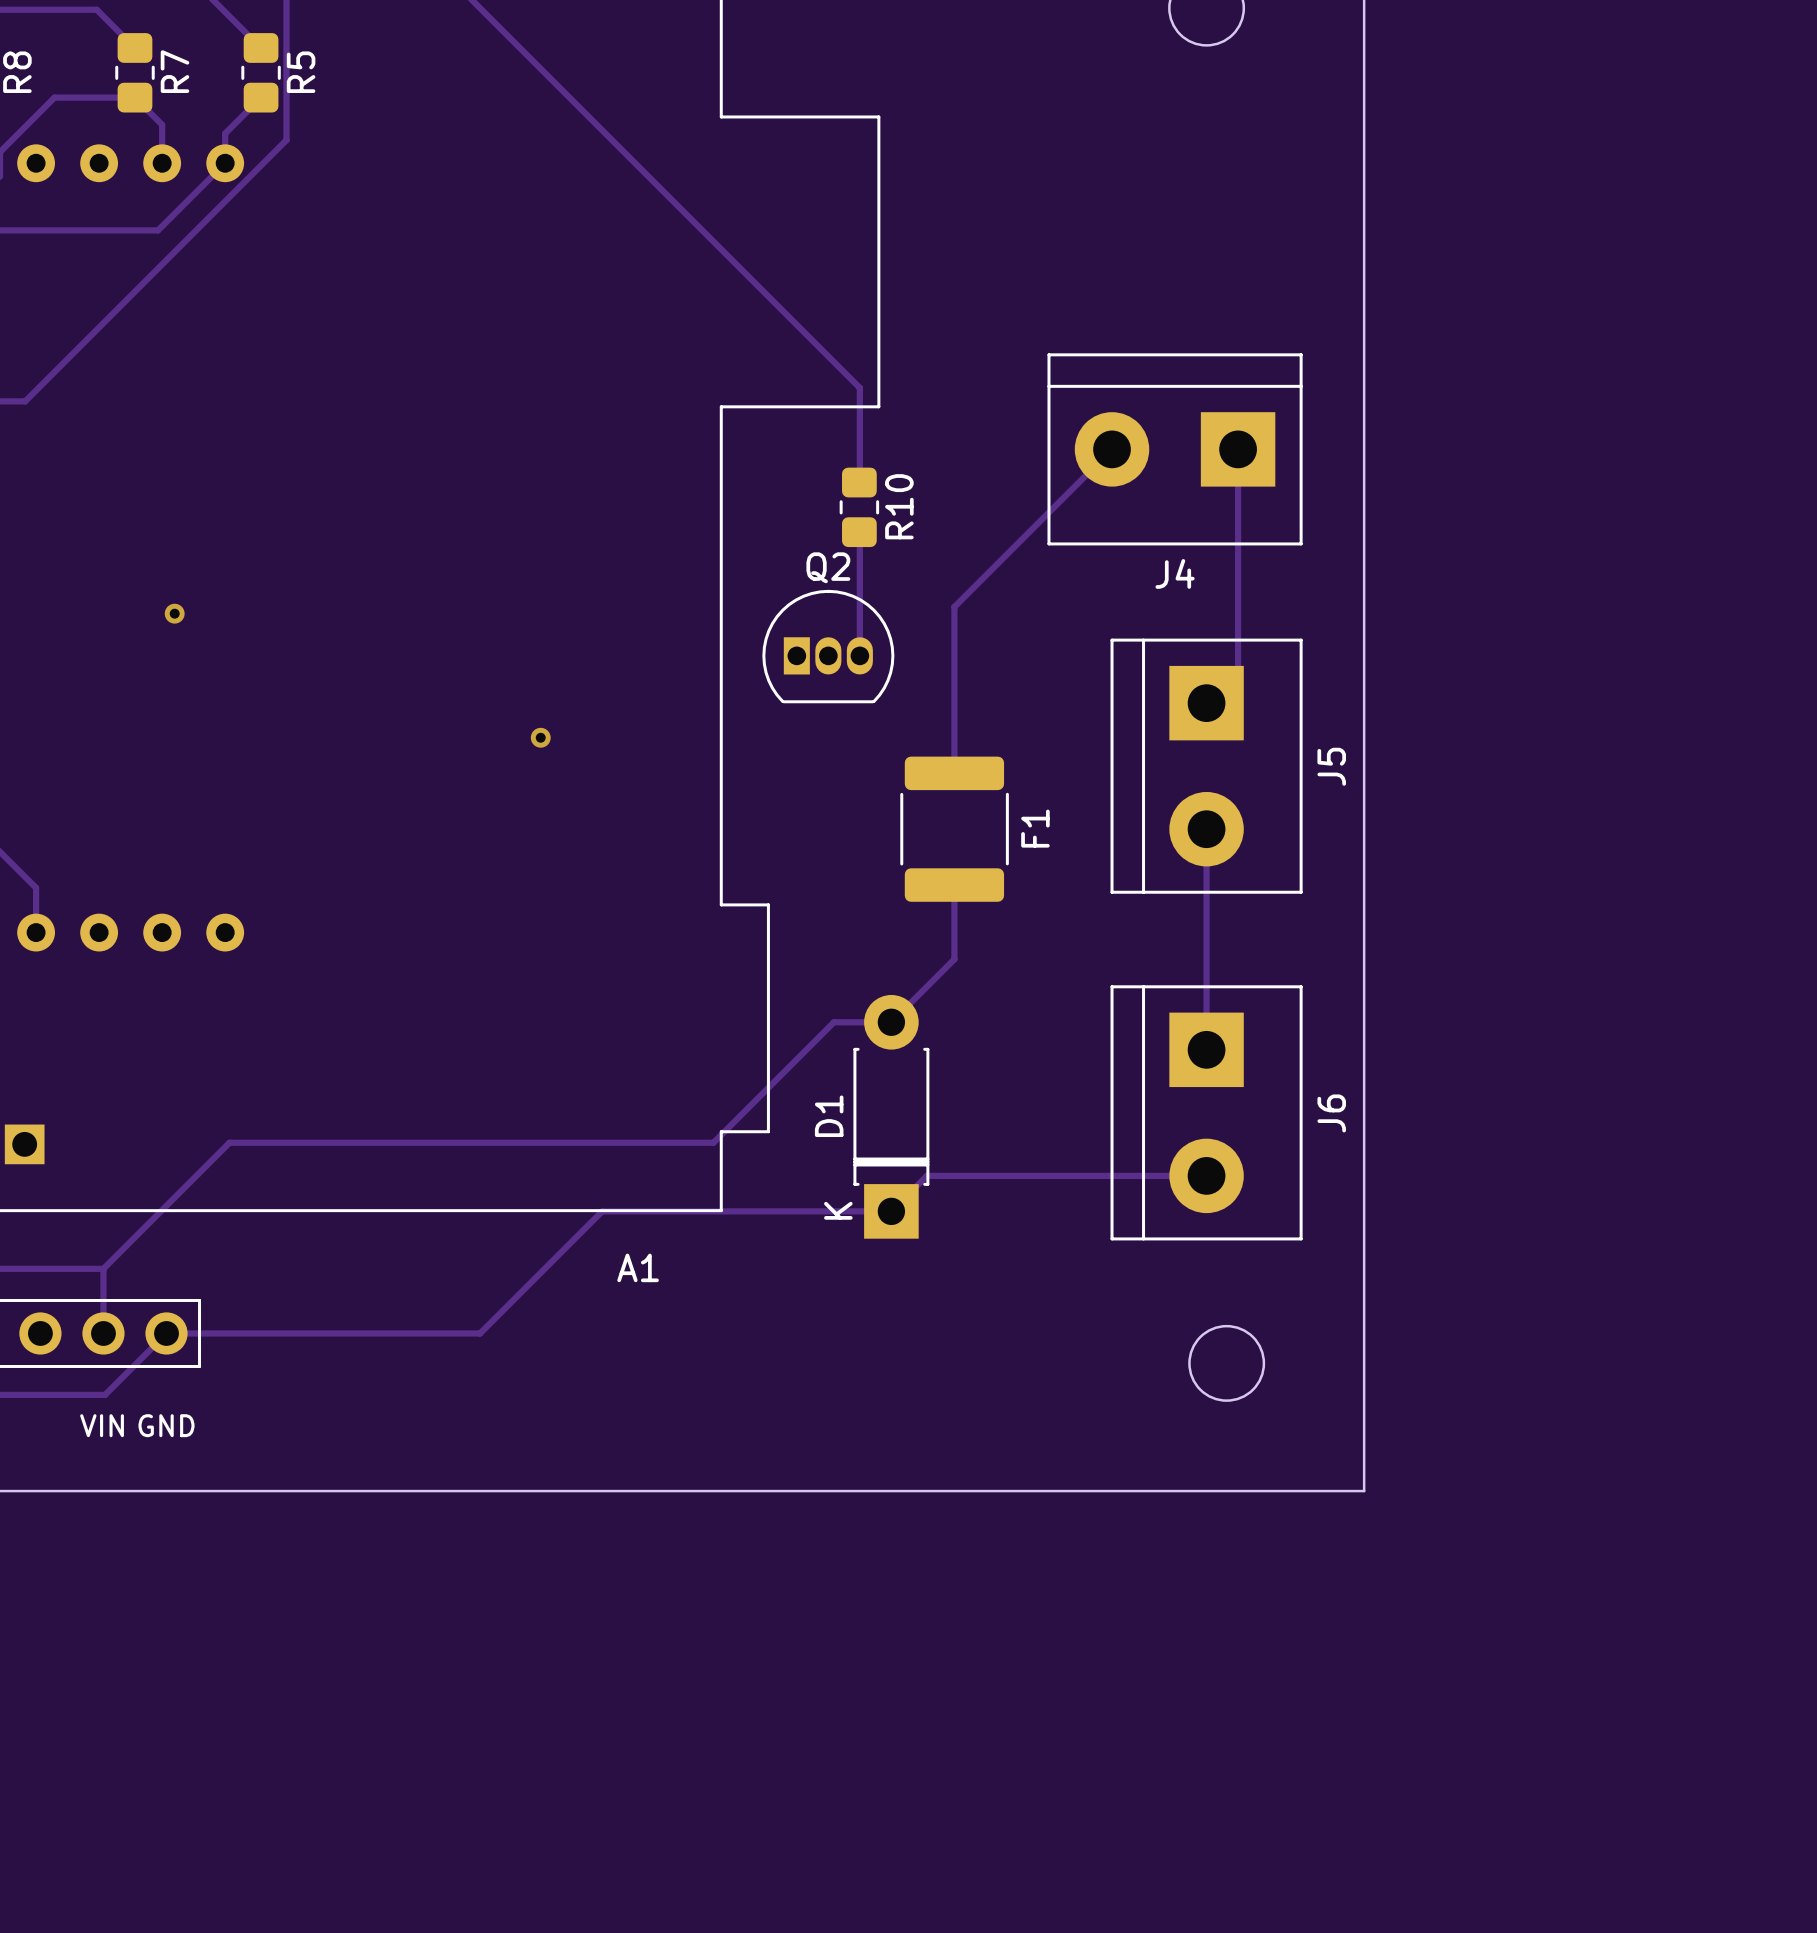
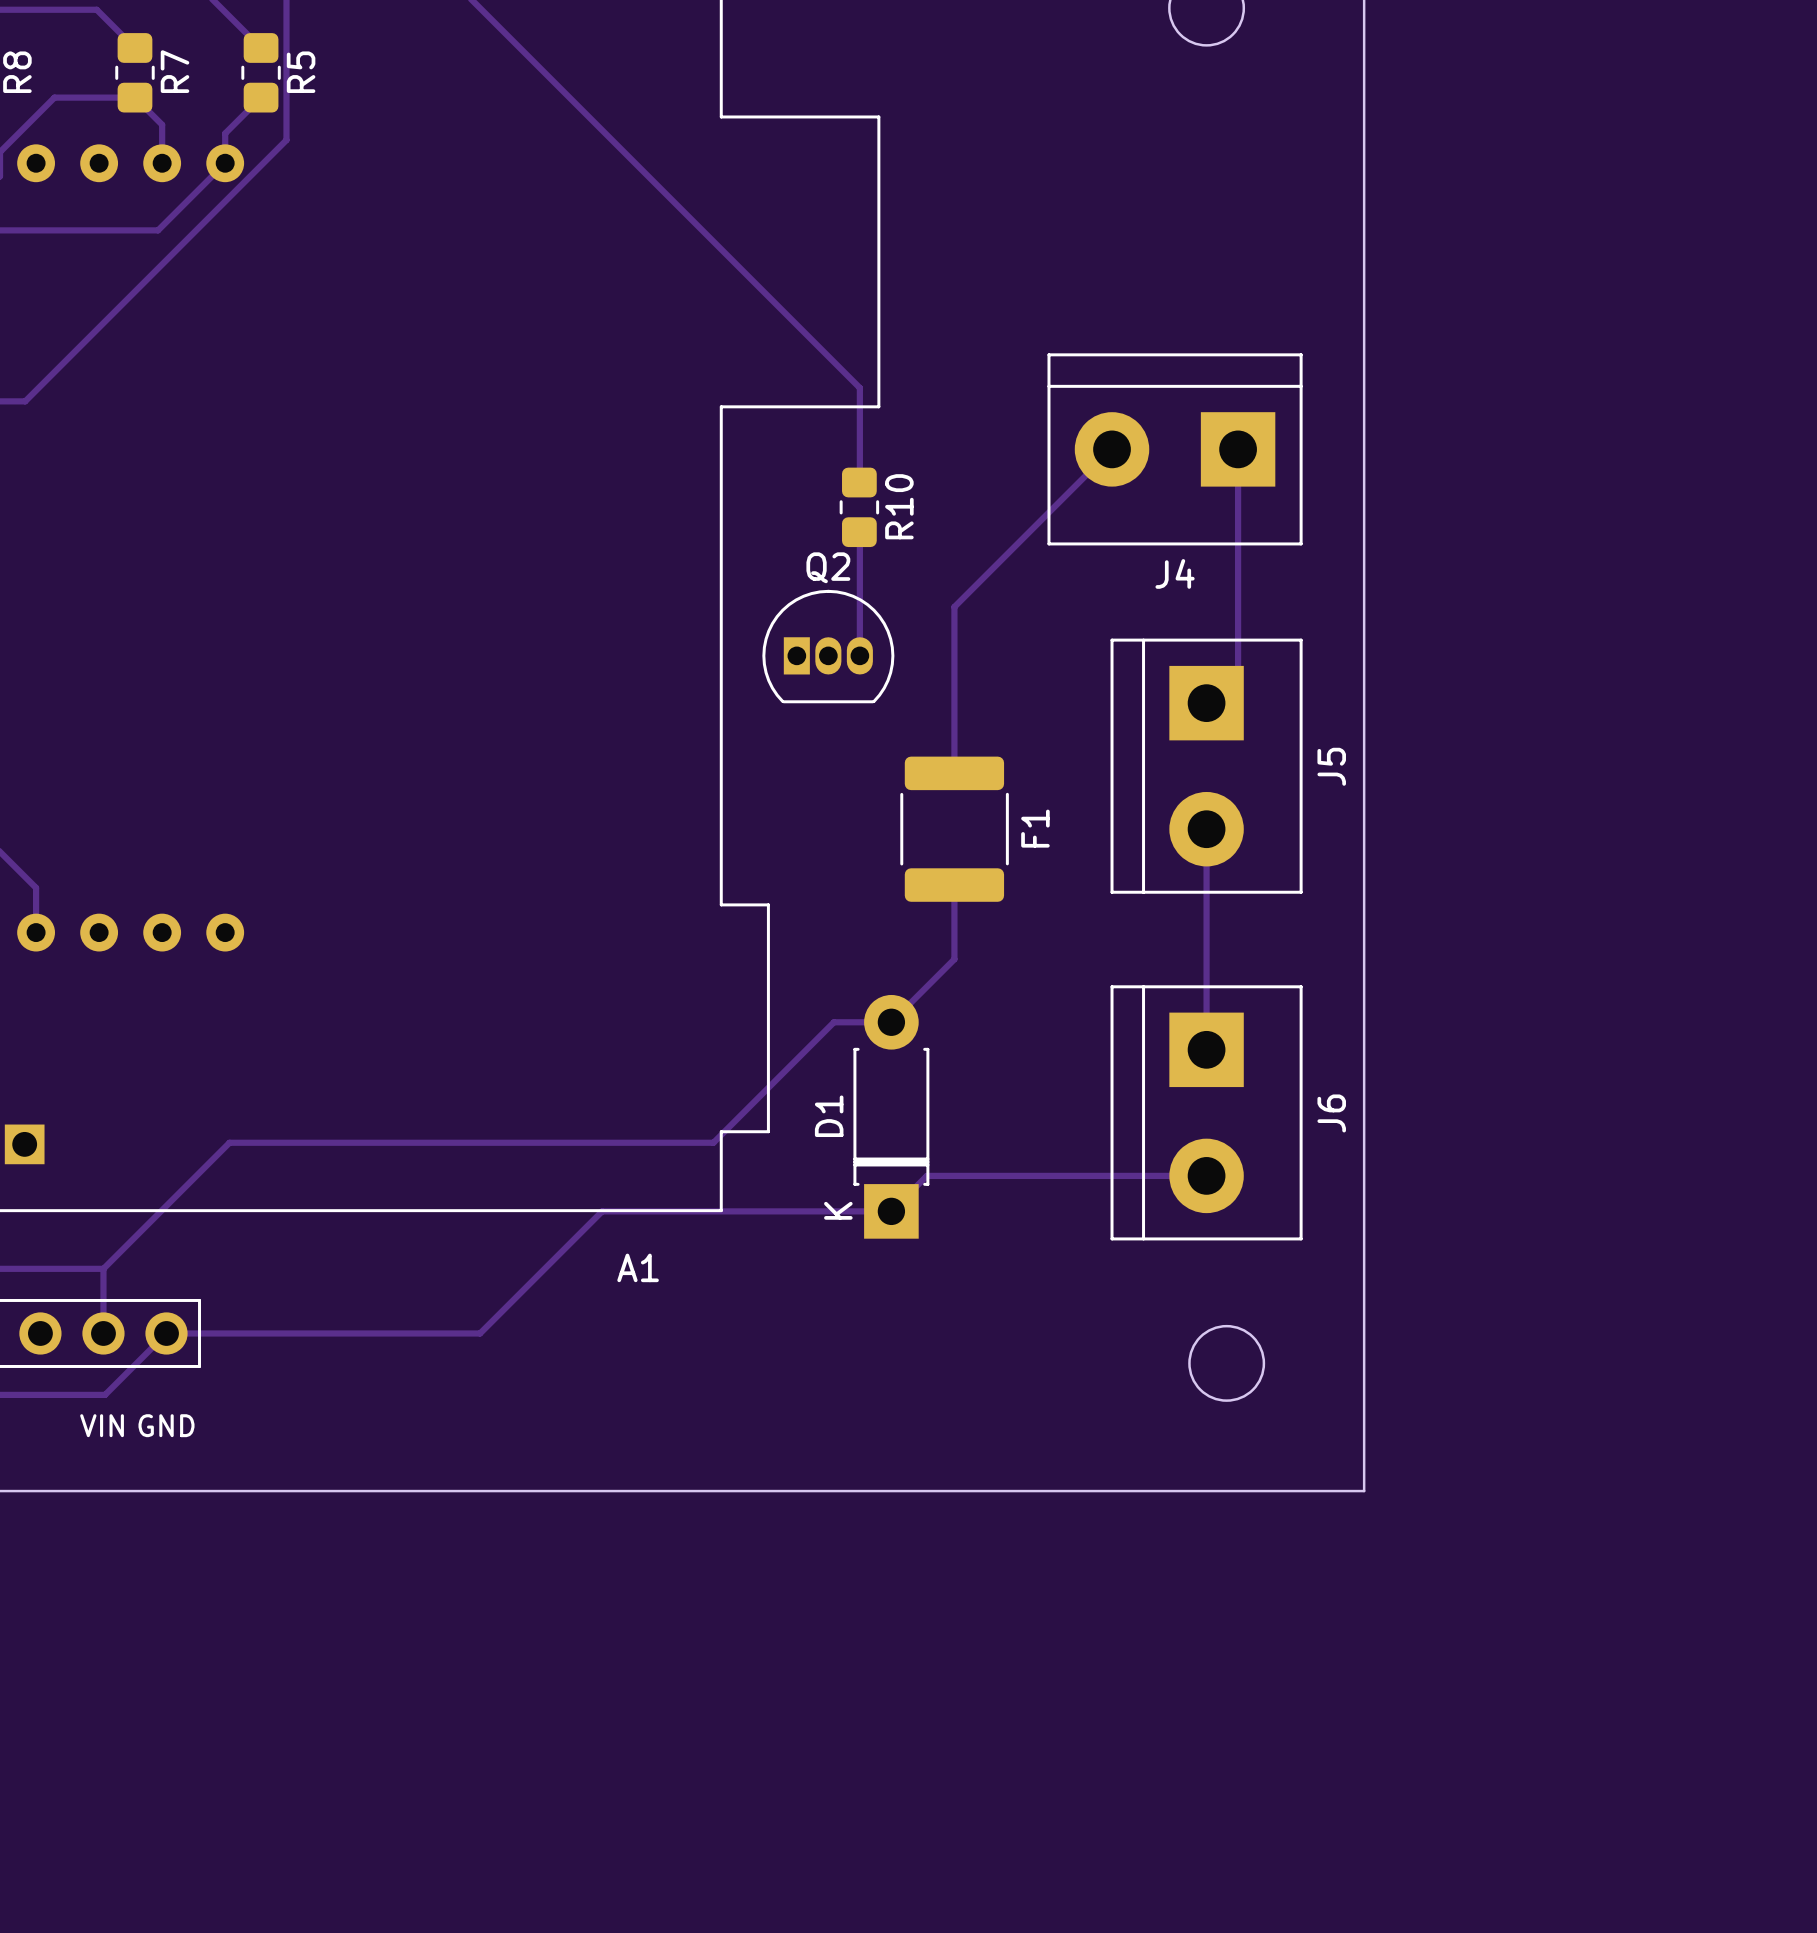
via: (174, 613) -> none
via: (540, 737) -> none

